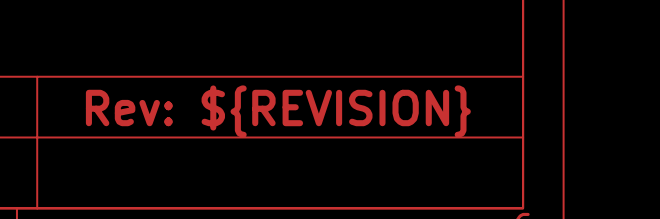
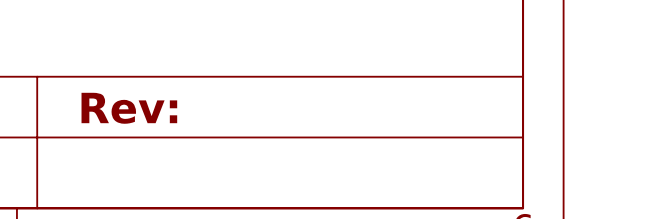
title block: Rev: ${REVISION} (278, 111) -> Rev: (129, 108)

